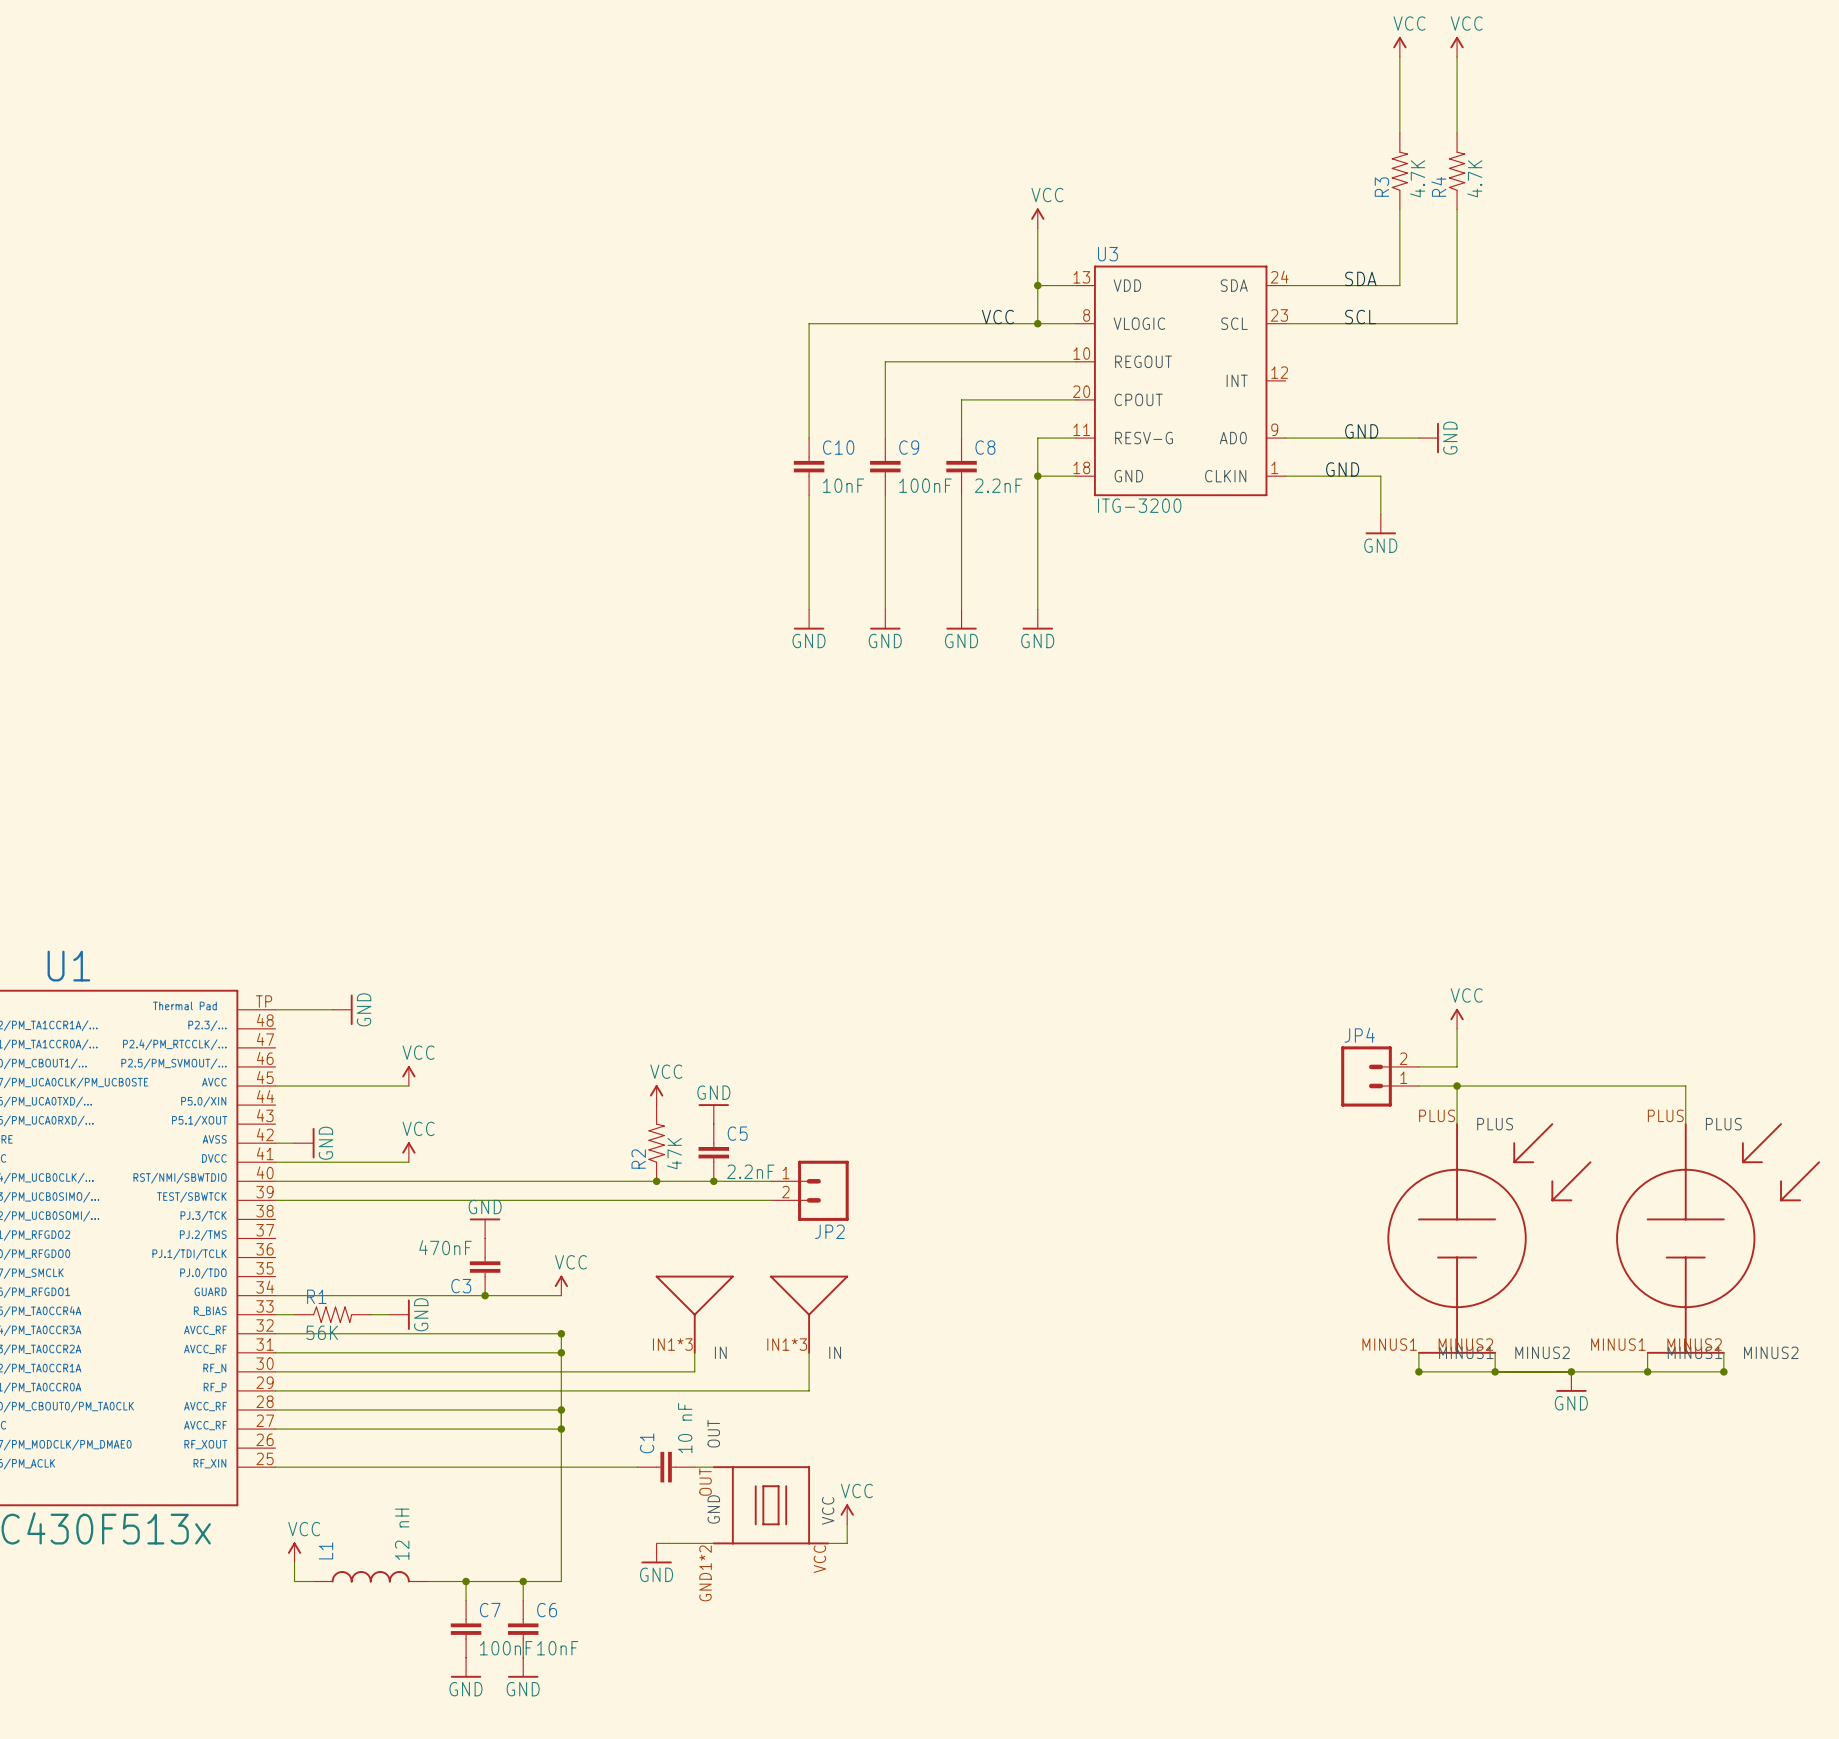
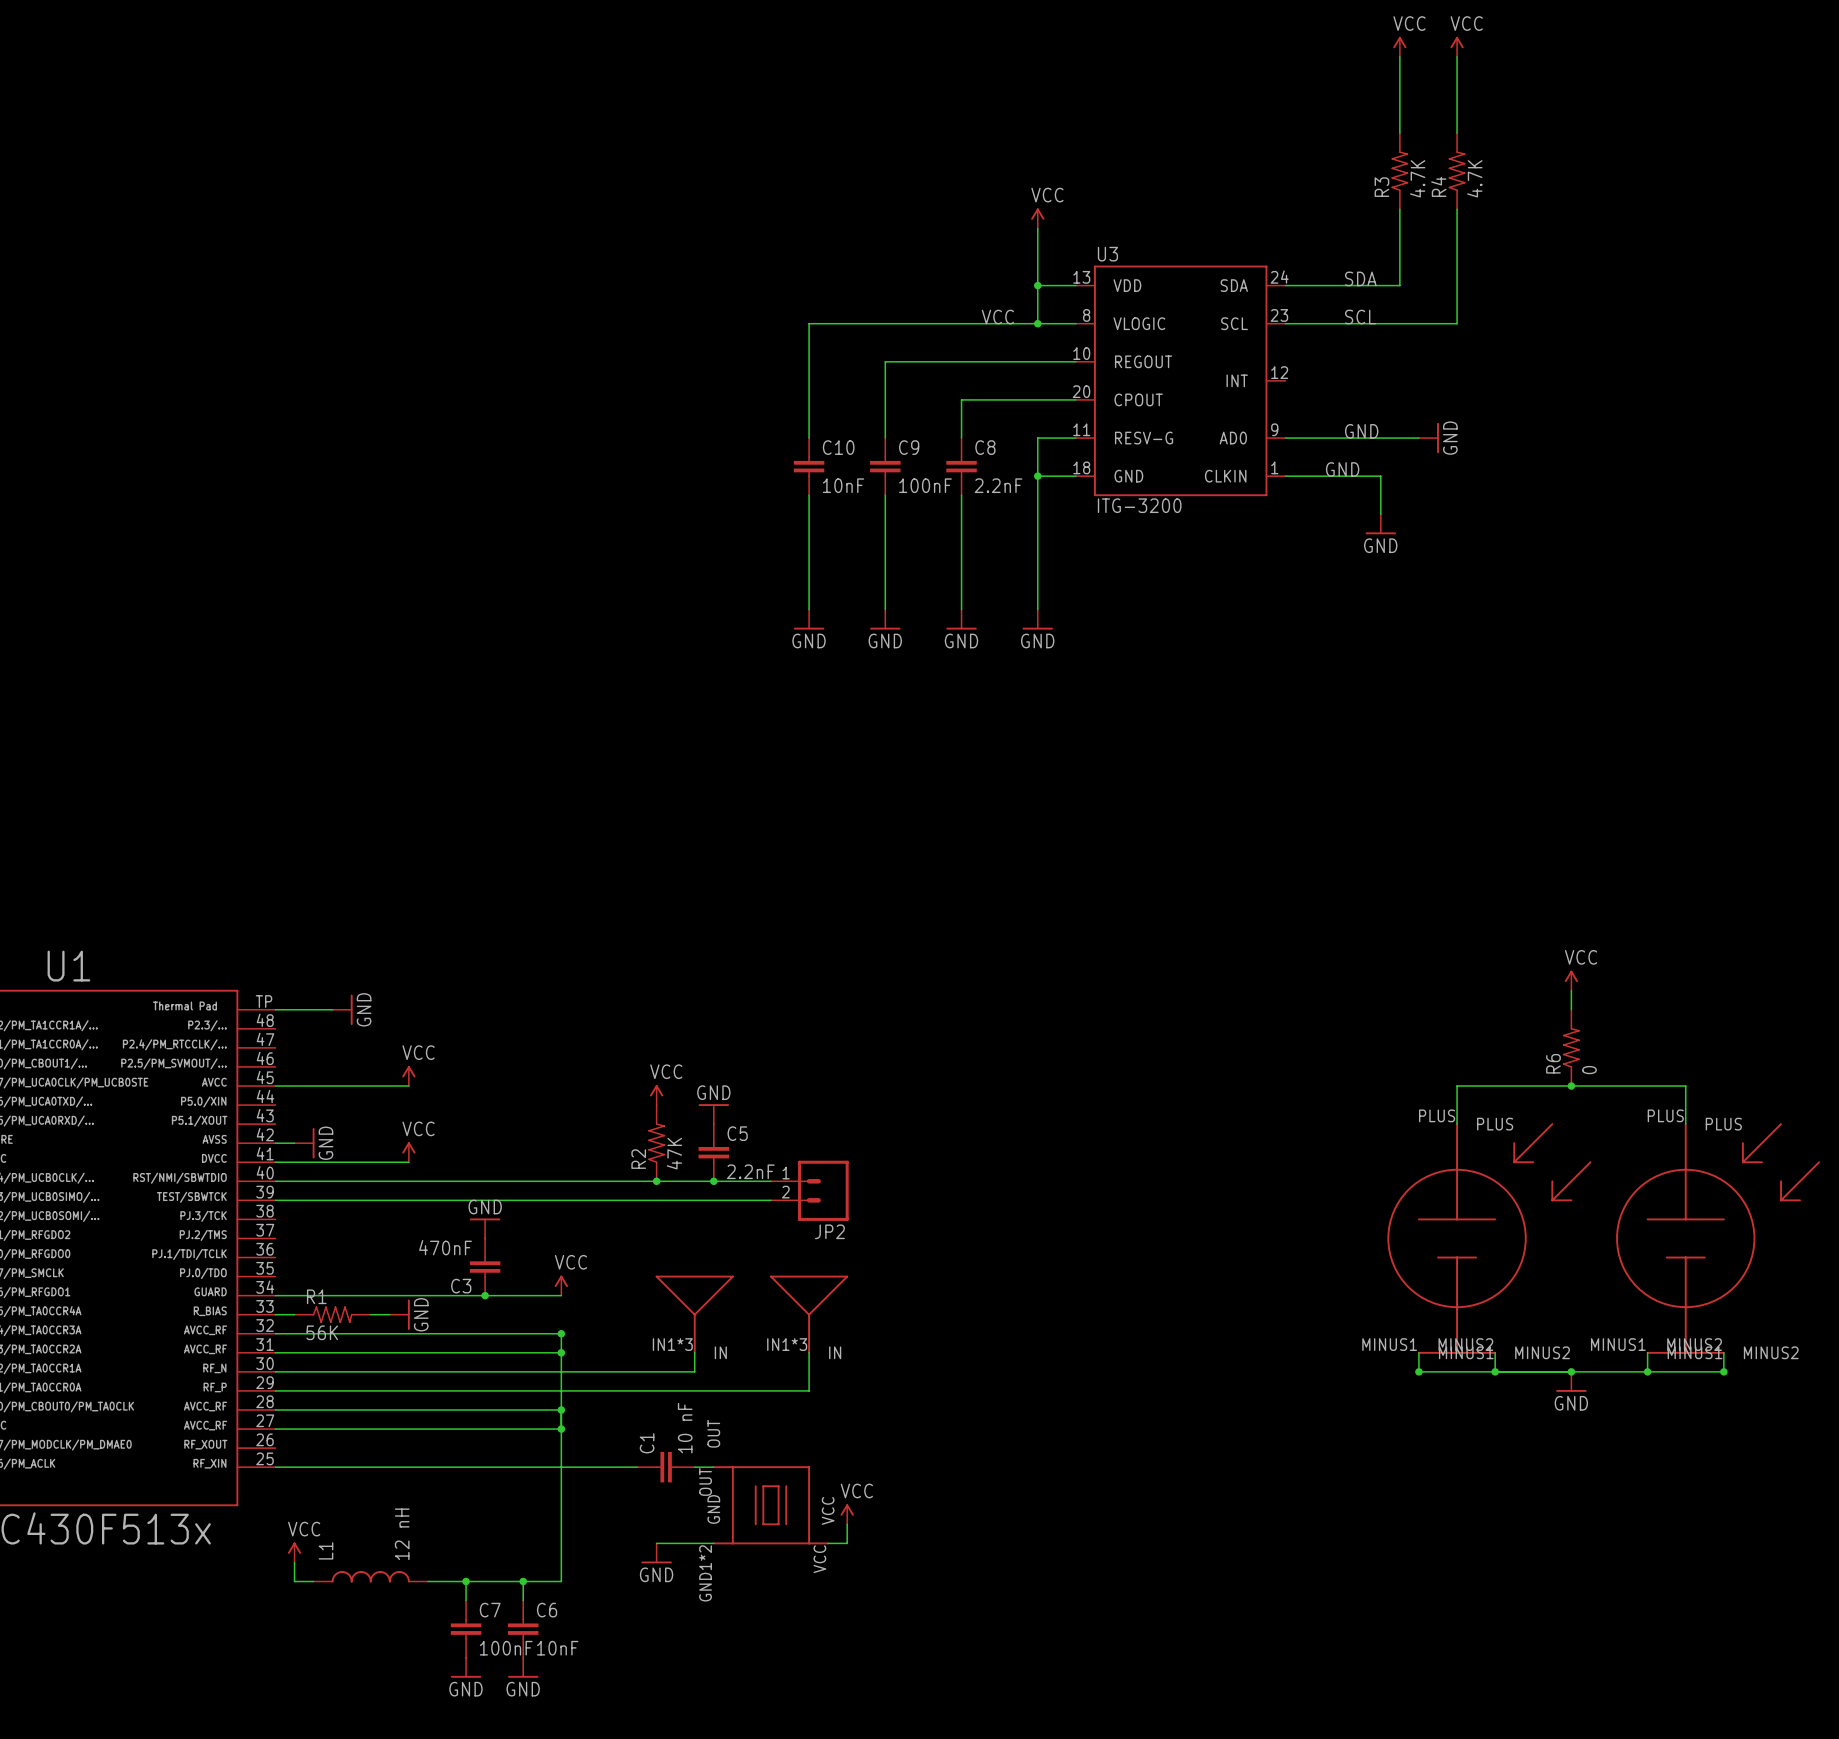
wire: none -> (1571, 990) (1571, 1009)
power symbol position: VCC (1457, 1018) -> VCC (1571, 980)
wire: (1457, 1028) (1457, 1066) (1418, 1066) -> none
R6: none -> 0 (1571, 1047)
JP4: (1380, 1076) -> none
wire: (1418, 1086) (1457, 1086) -> none
junction: (1457, 1086) -> none
junction: none -> (1571, 1086)

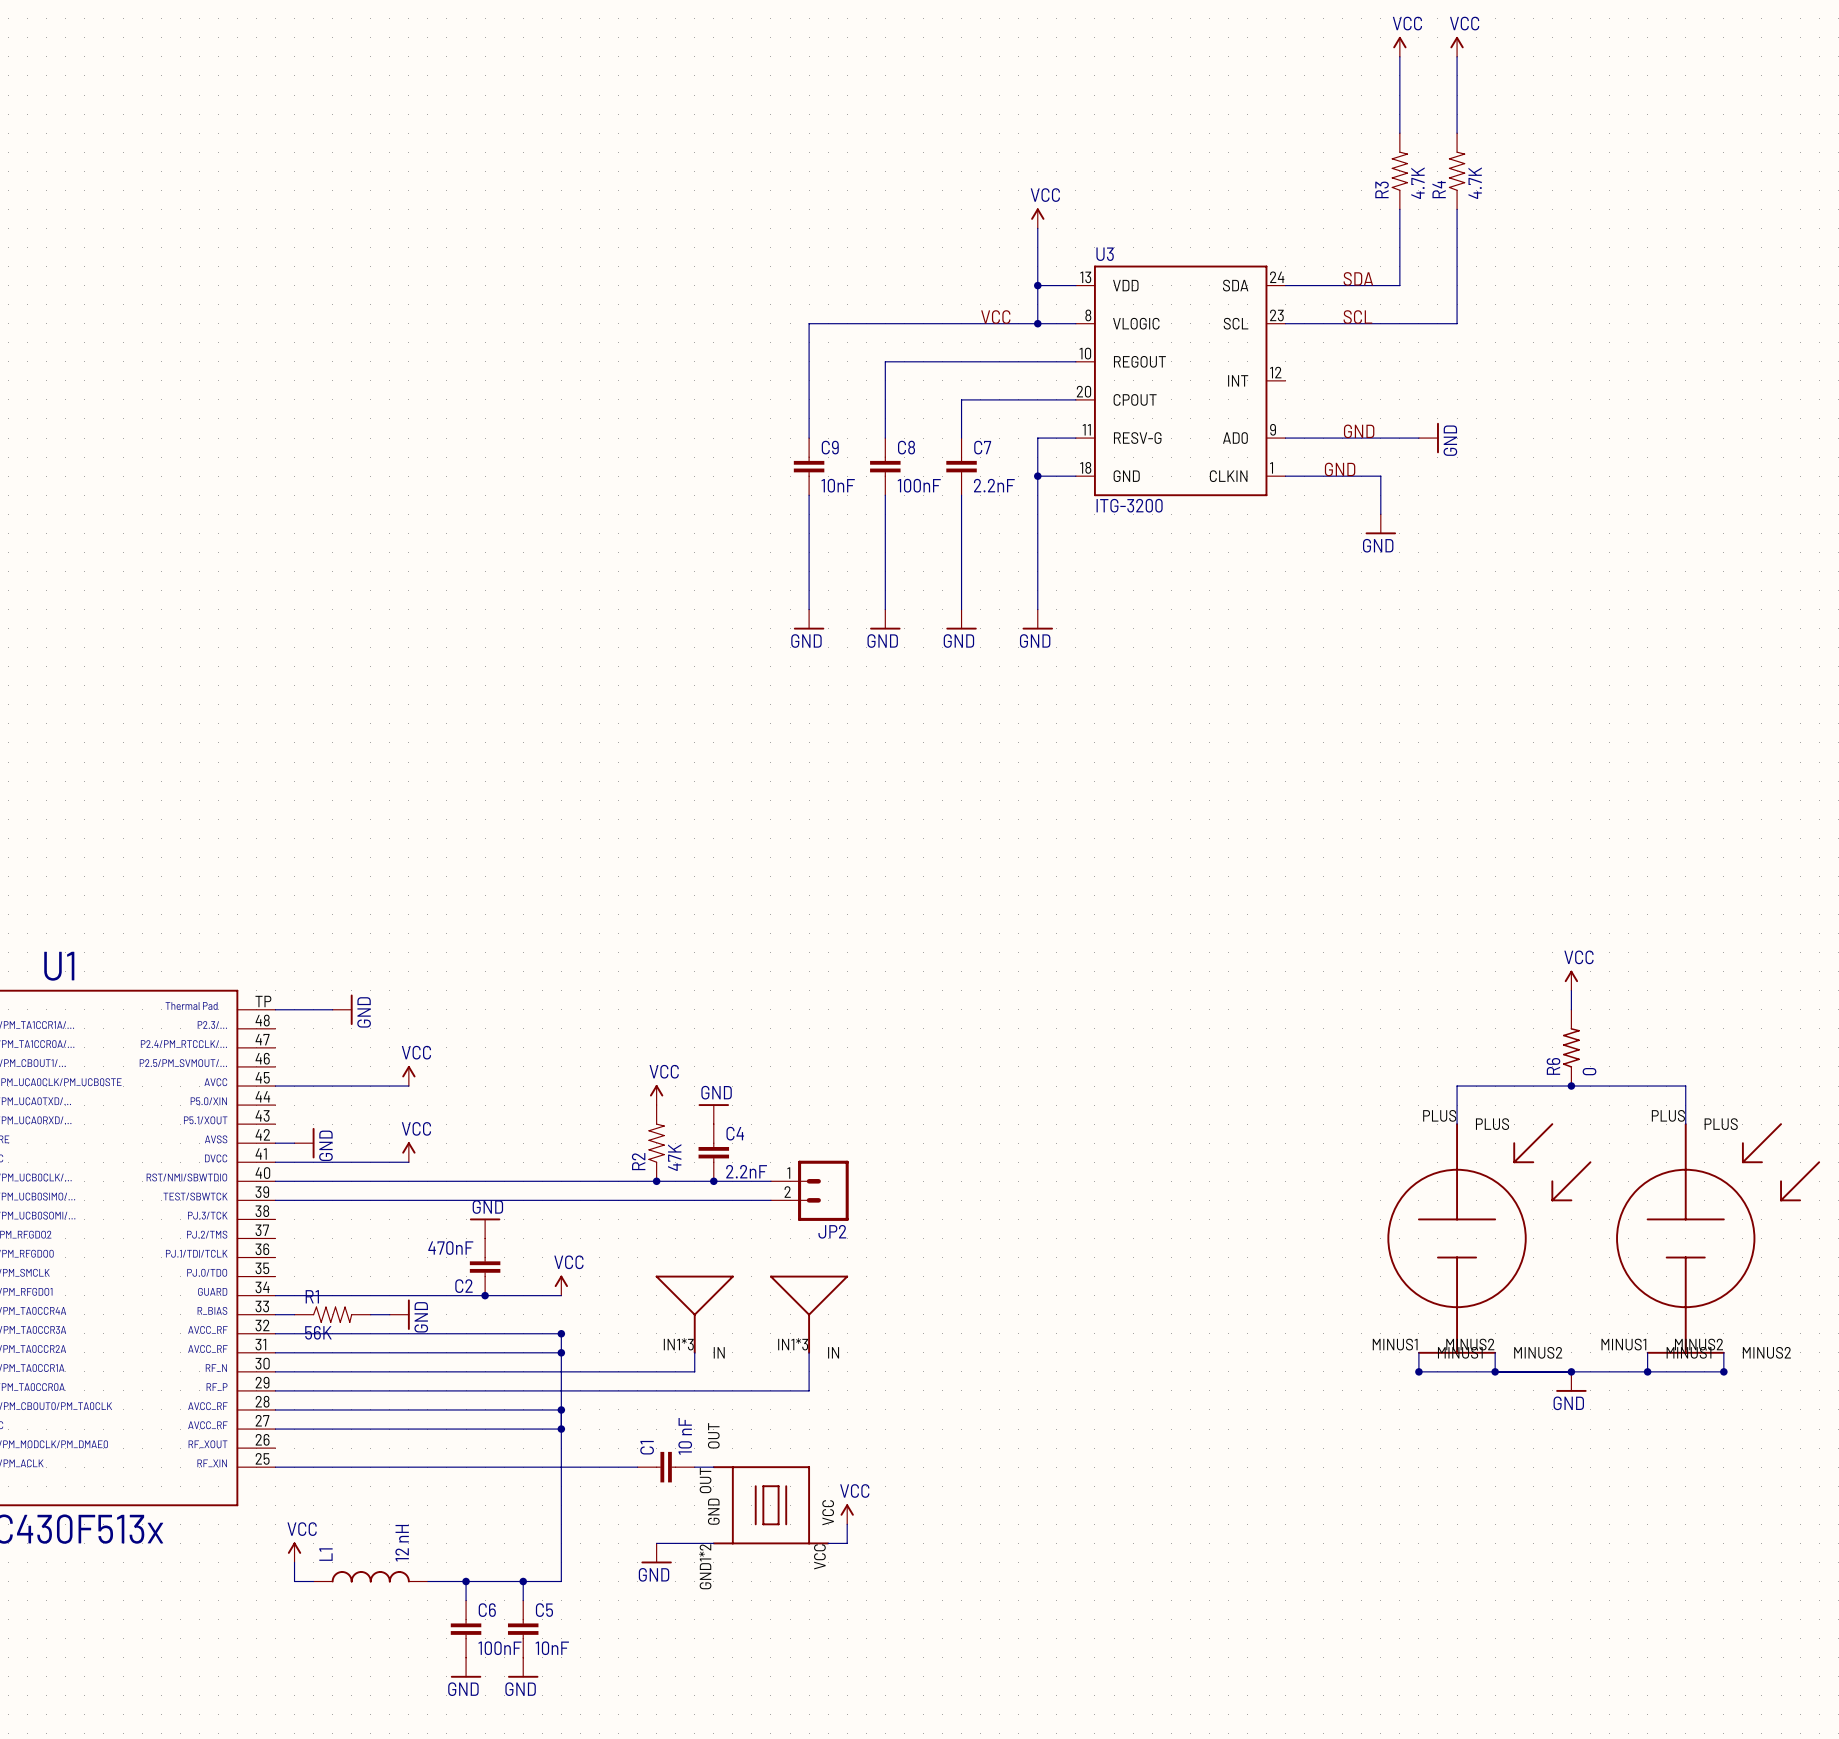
C10 name: C10 (838, 447) -> C9 (830, 447)
C9 name: C9 (909, 447) -> C8 (906, 447)
C8 name: C8 (985, 447) -> C7 (982, 447)
C5 name: C5 (737, 1133) -> C4 (735, 1133)
C3 name: C3 (461, 1286) -> C2 (463, 1286)
C7 name: C7 (490, 1610) -> C6 (487, 1610)
C6 name: C6 (547, 1610) -> C5 (544, 1610)

